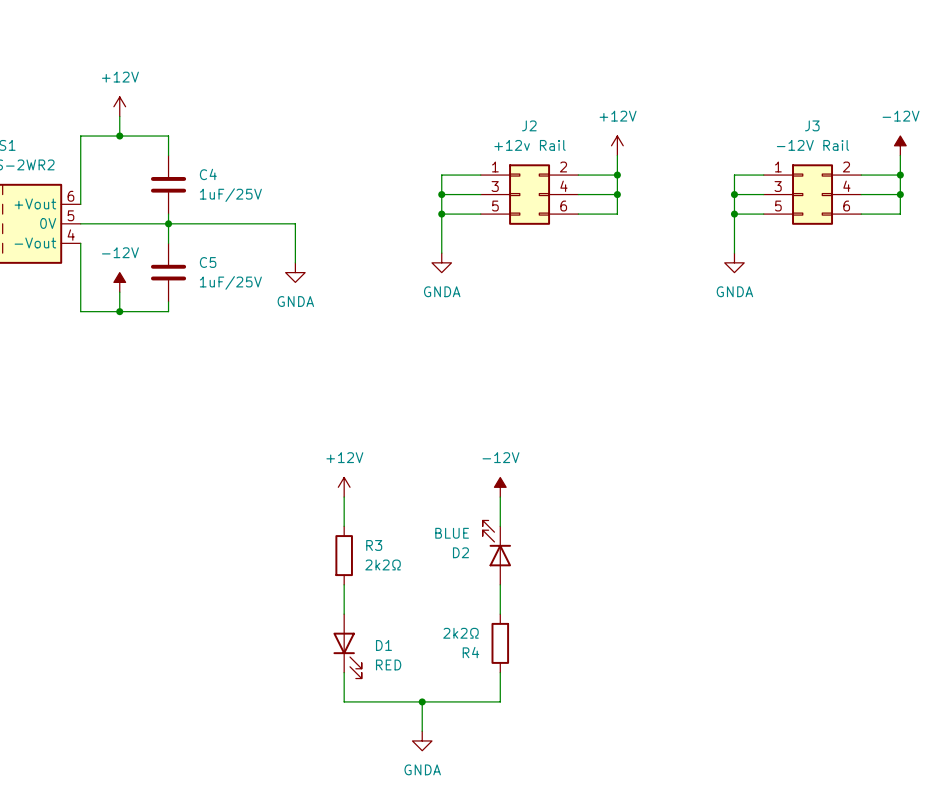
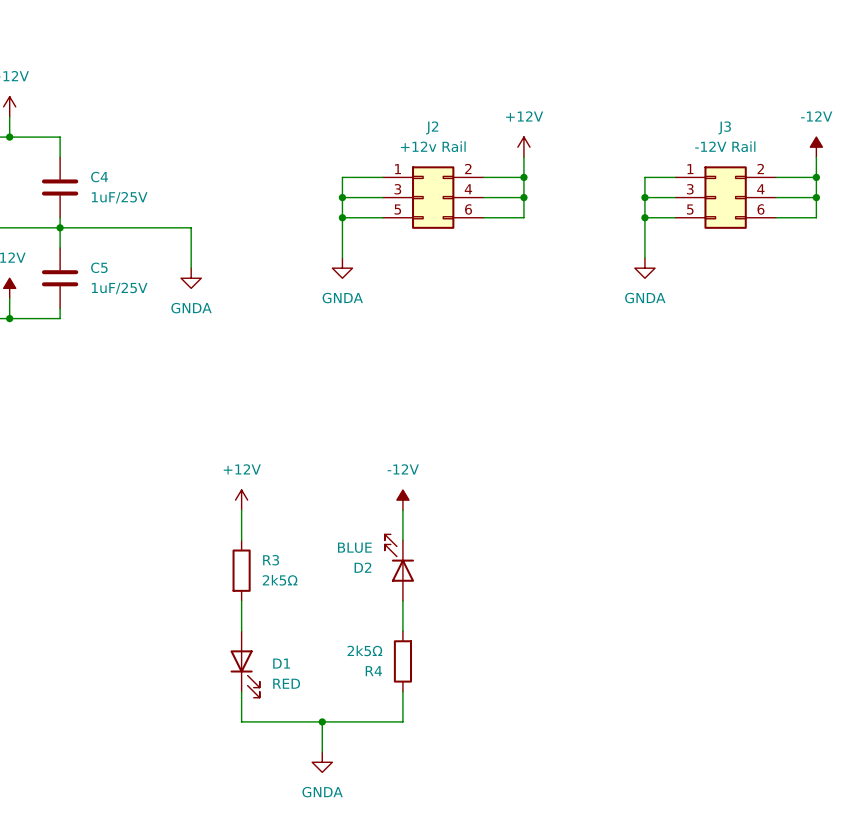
R3 value: 2k2Ω (383, 564) -> 2k5Ω (280, 580)
R4 value: 2k2Ω (460, 633) -> 2k5Ω (364, 650)

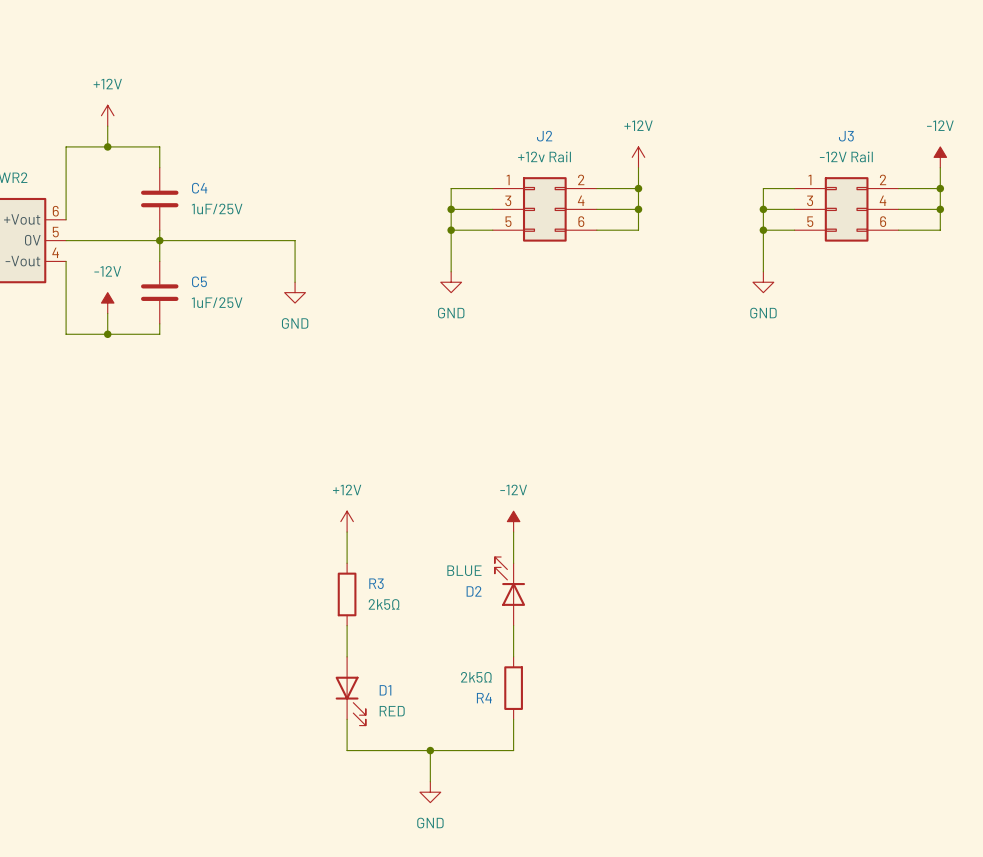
power symbol: GNDA (342, 268) -> GND (451, 282)
power symbol: GNDA (644, 268) -> GND (763, 282)
power symbol: GNDA (191, 278) -> GND (295, 292)
power symbol: GNDA (322, 762) -> GND (430, 792)

